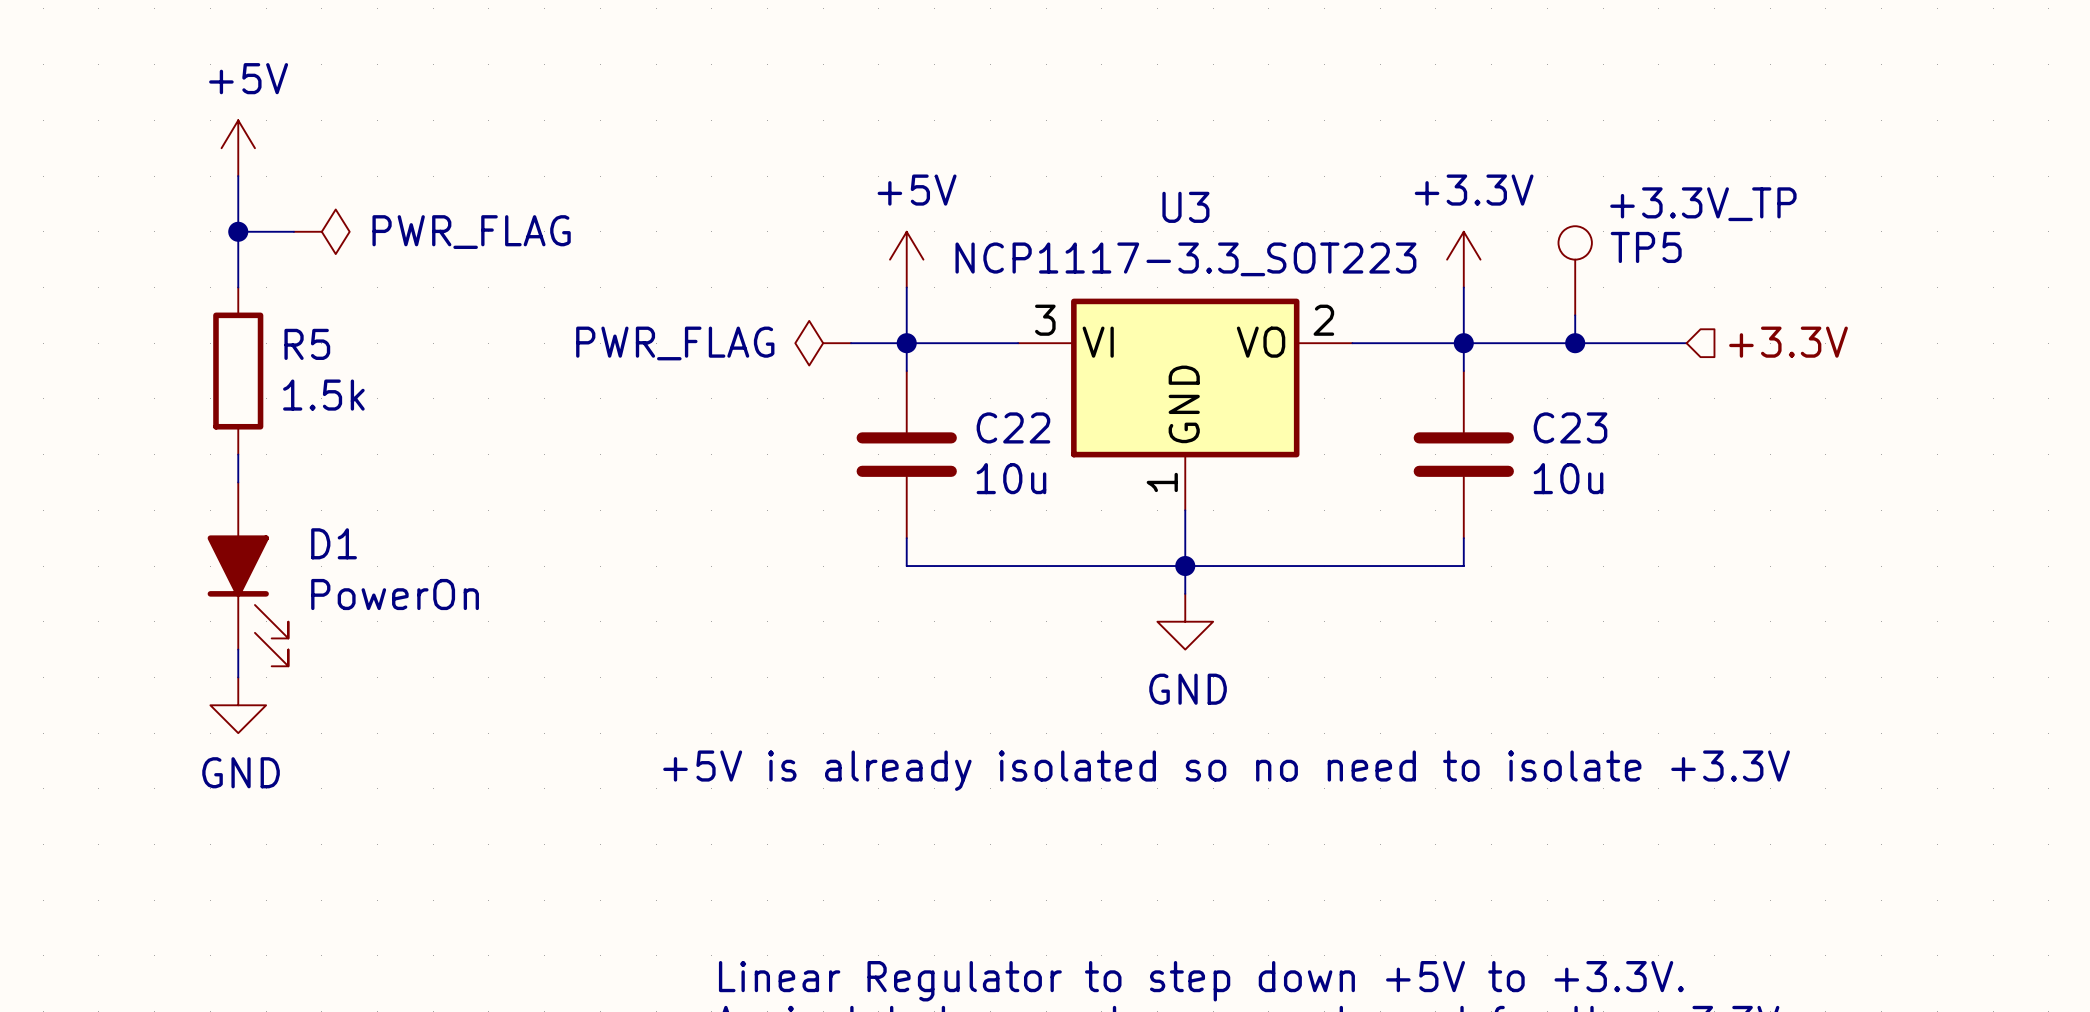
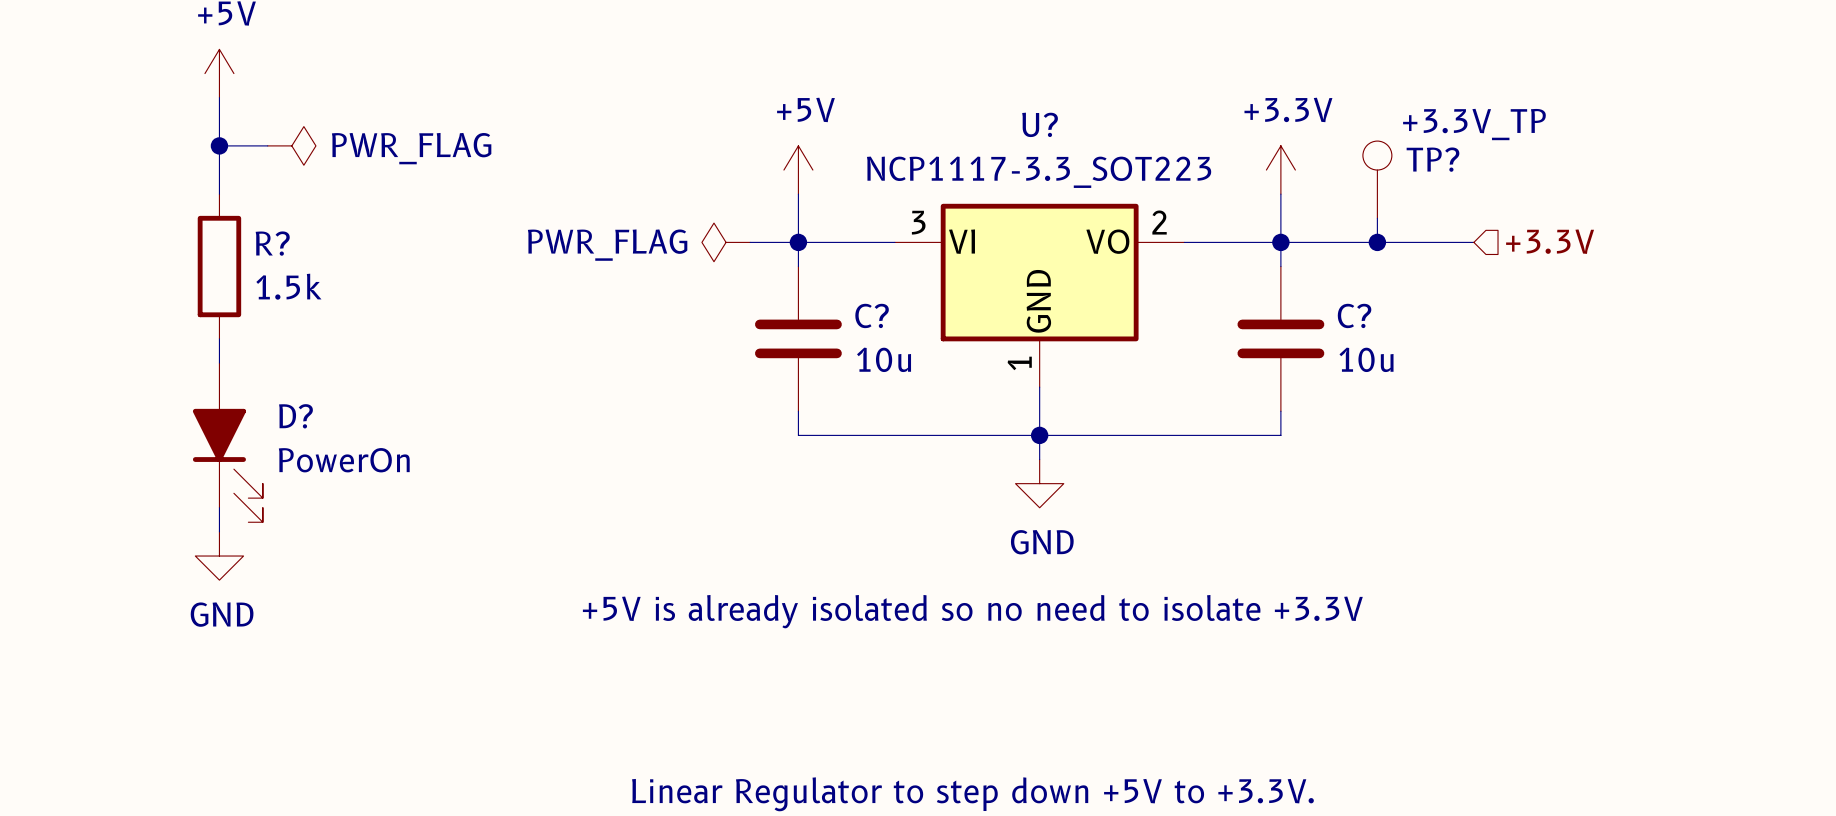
U3 name: U3 (1185, 207) -> U? (1040, 124)
TP5 name: TP5 (1646, 247) -> TP? (1432, 159)
R5 name: R5 (307, 344) -> R? (272, 243)
C22 name: C22 (1013, 427) -> C? (872, 315)
C23 name: C23 (1570, 427) -> C? (1354, 315)
D1 name: D1 (334, 543) -> D? (295, 416)

